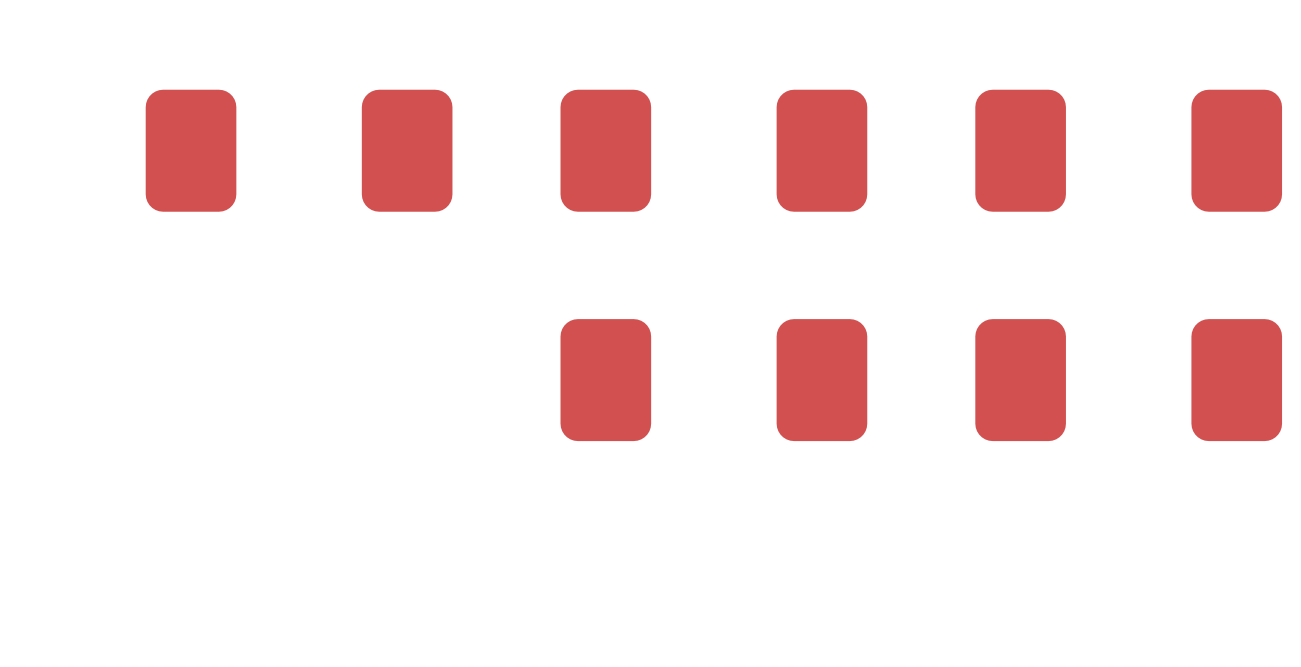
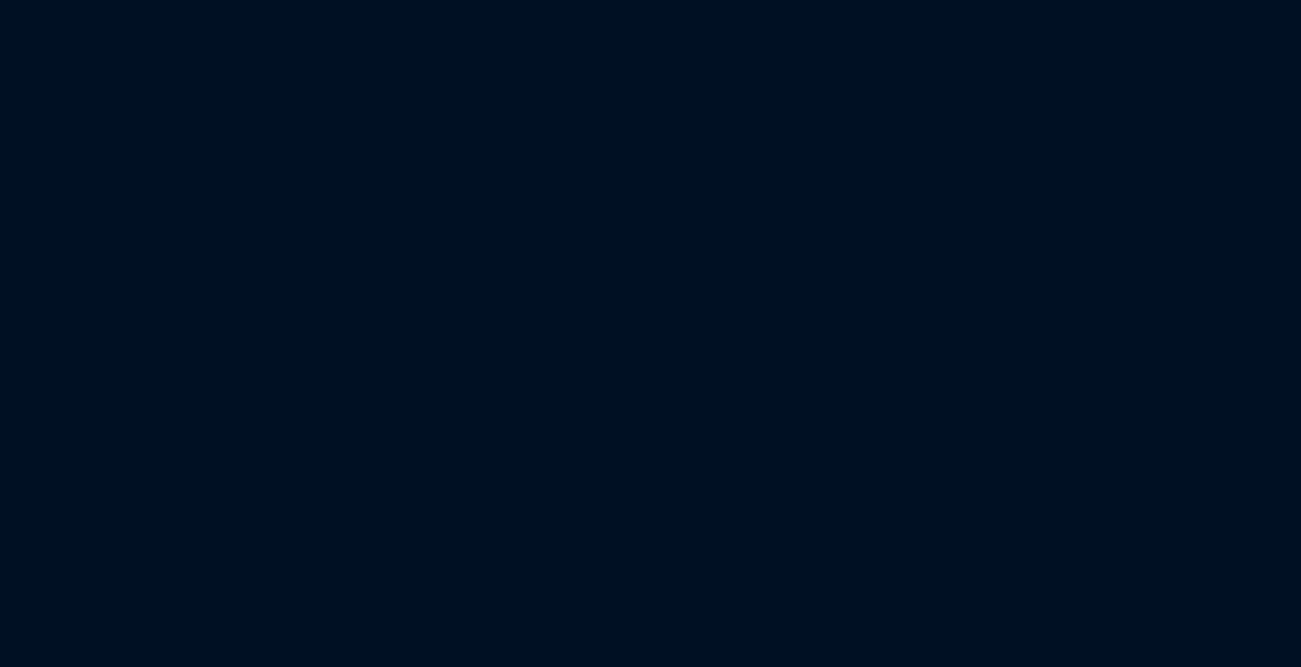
part: (299, 150) -> none
part: (713, 150) -> none
part: (1128, 150) -> none
part: (713, 380) -> none
part: (1128, 380) -> none

